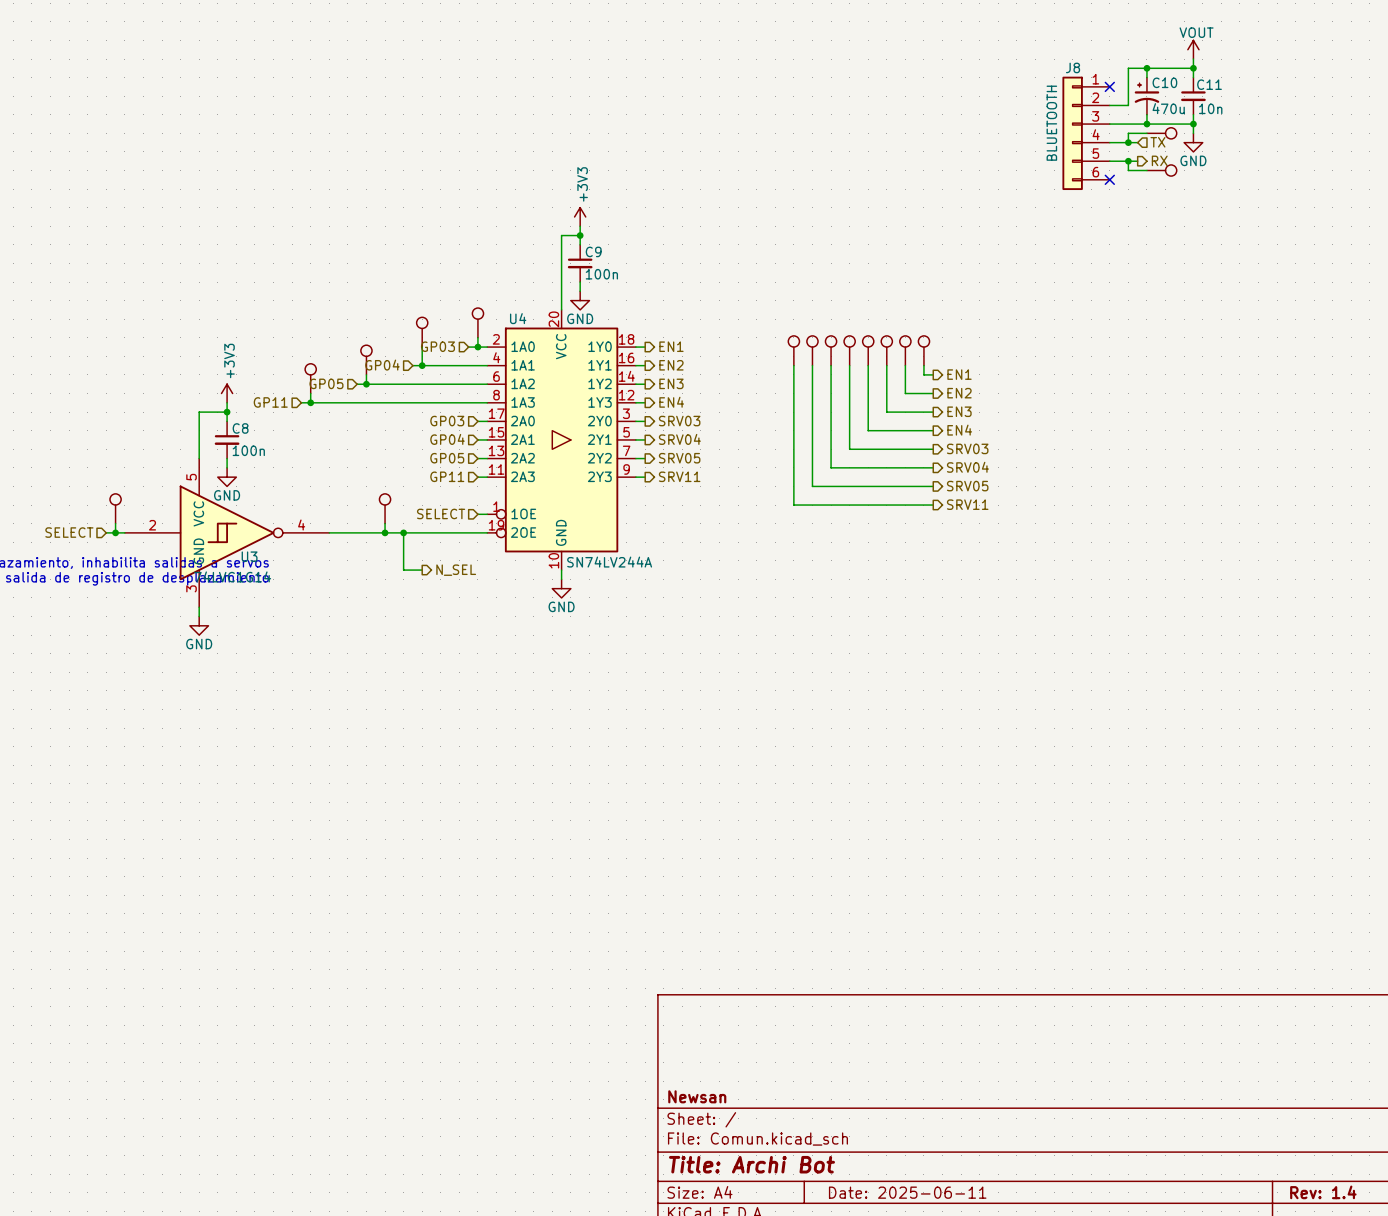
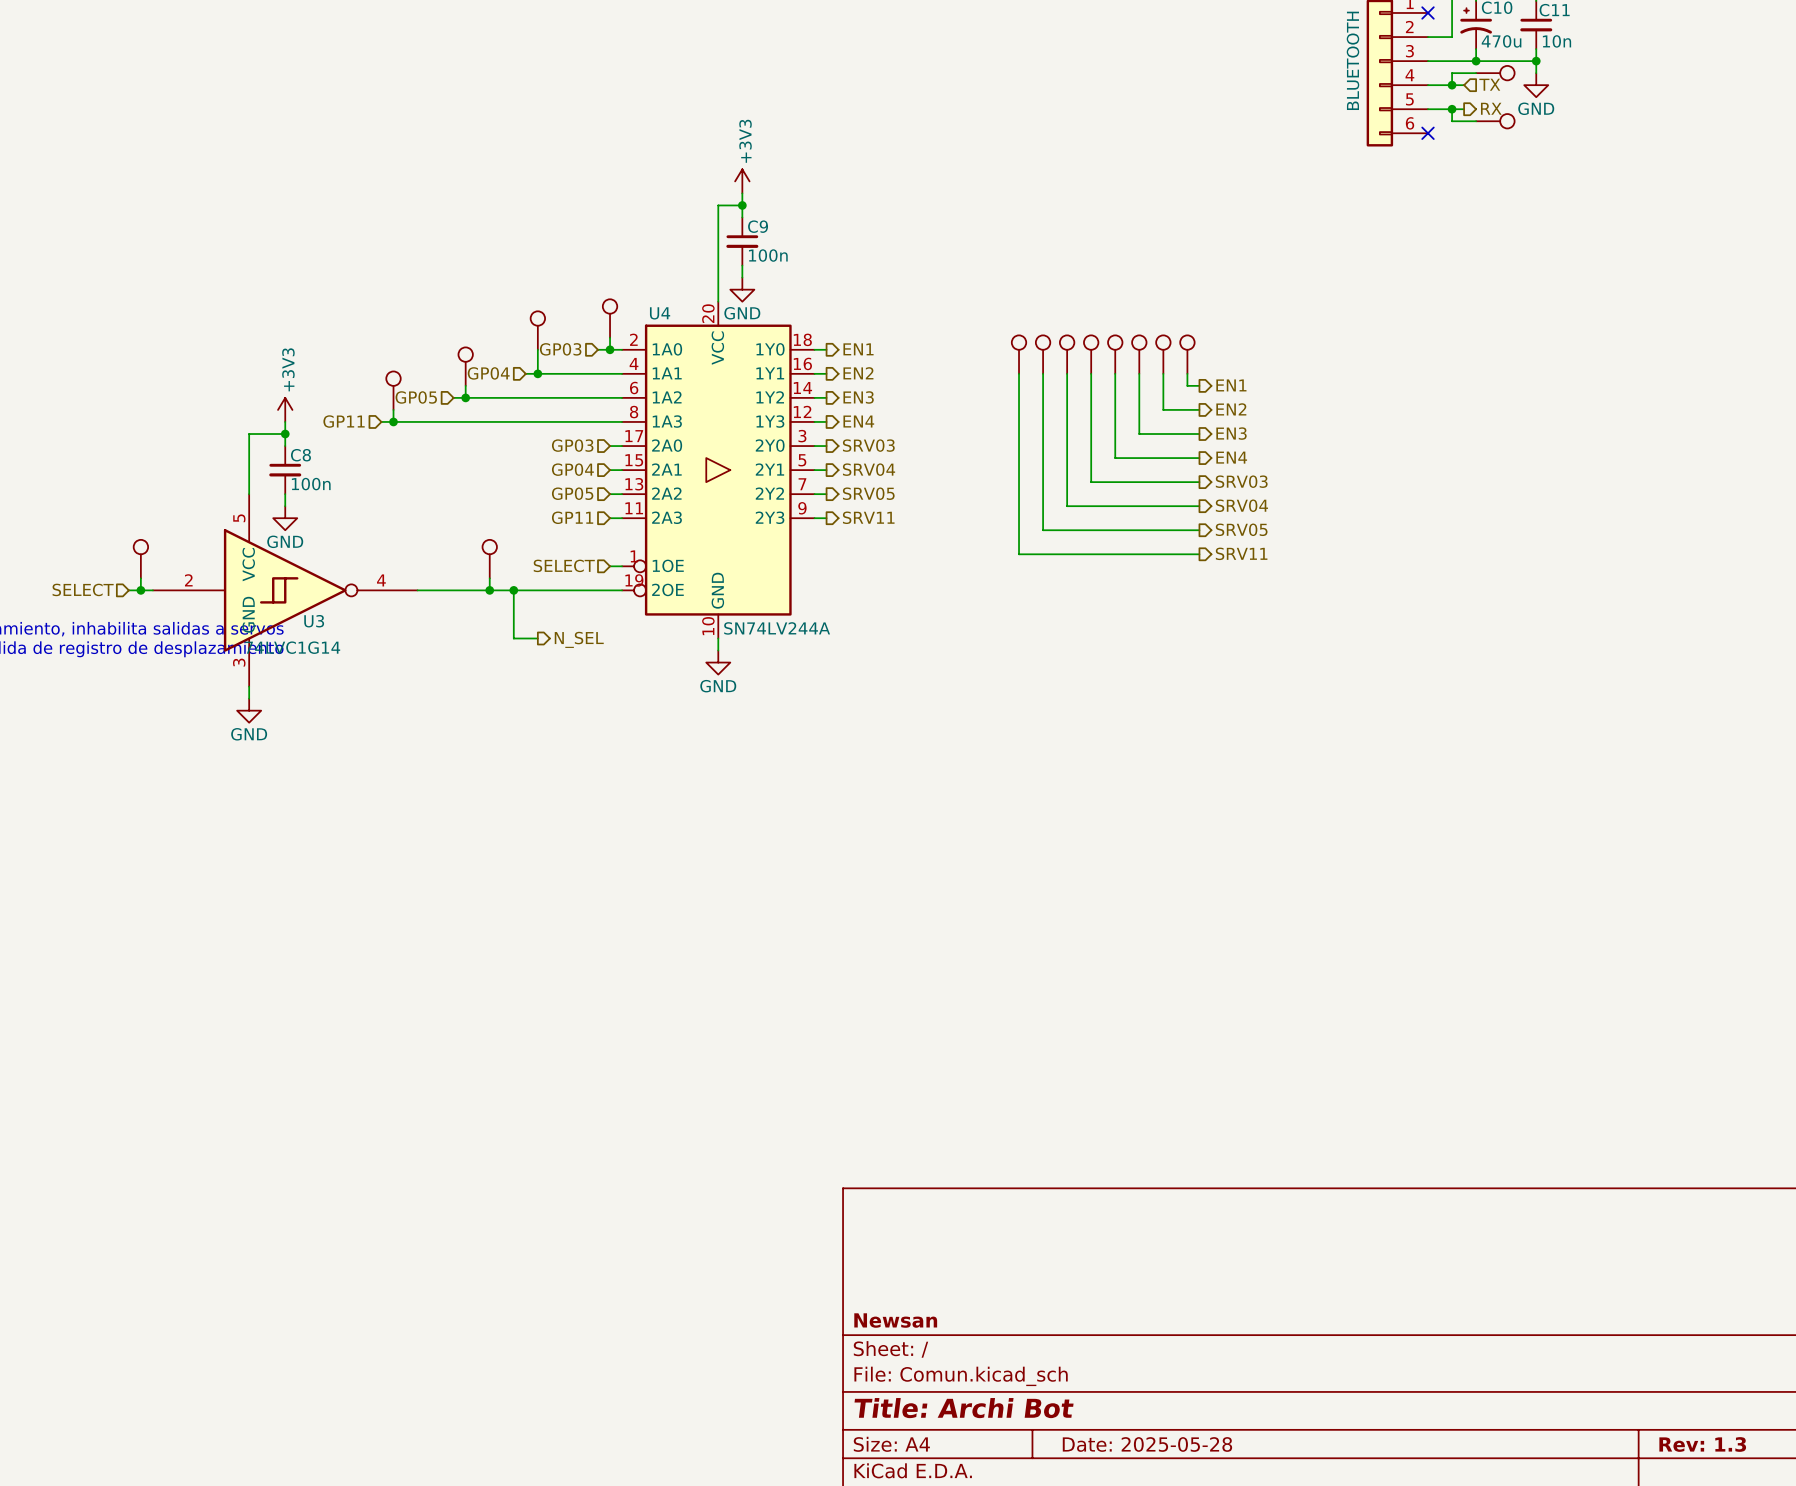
title block: Date: 2025-06-11 (907, 1192) -> Date: 2025-05-28 (1147, 1444)
title block: Rev: 1.4 (1323, 1192) -> Rev: 1.3 (1702, 1444)

